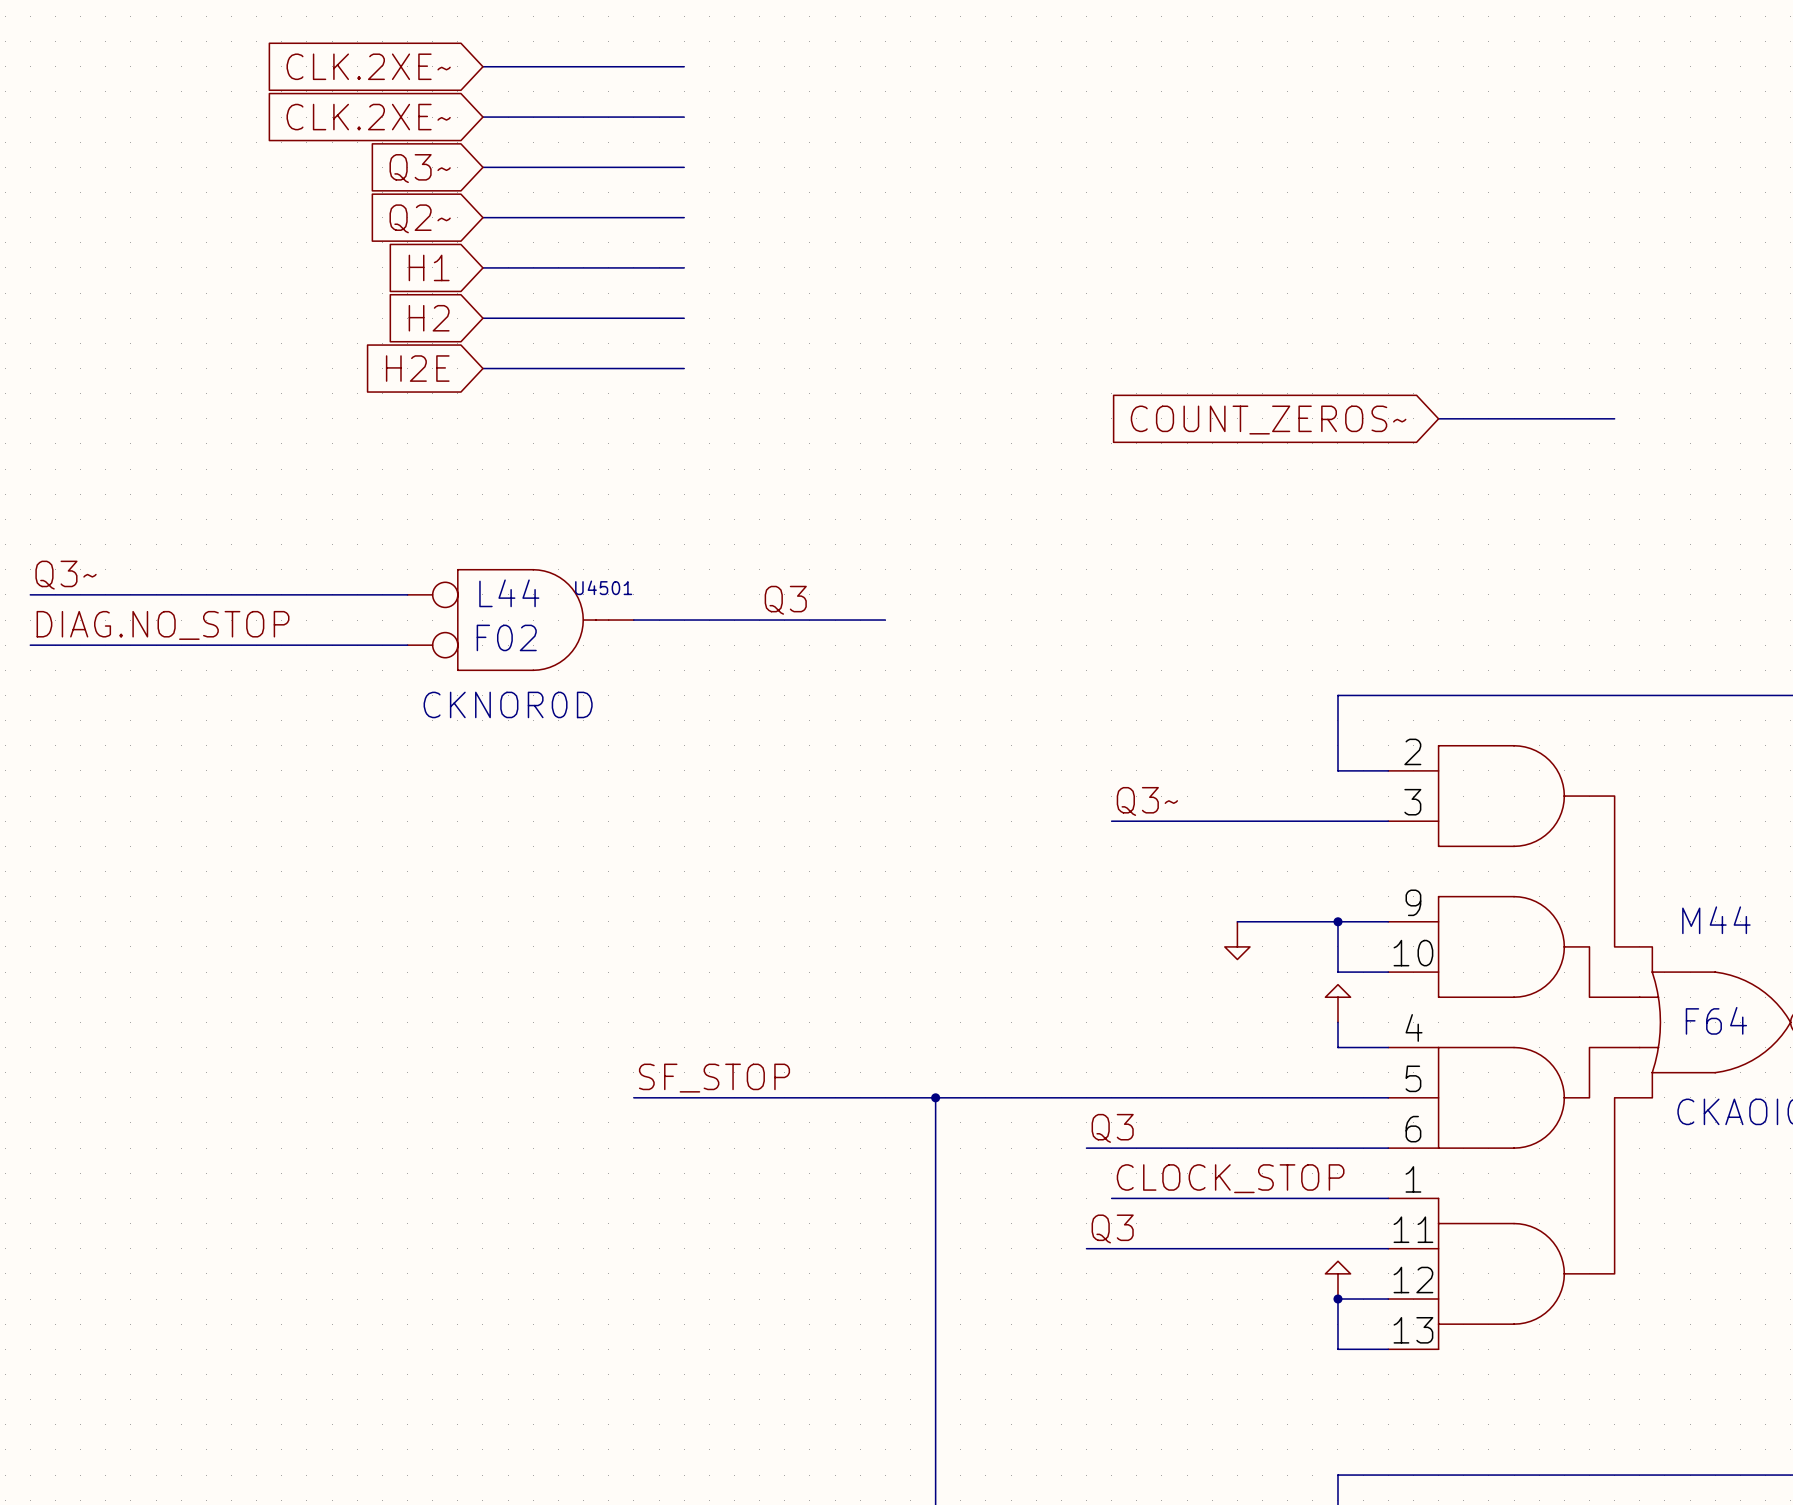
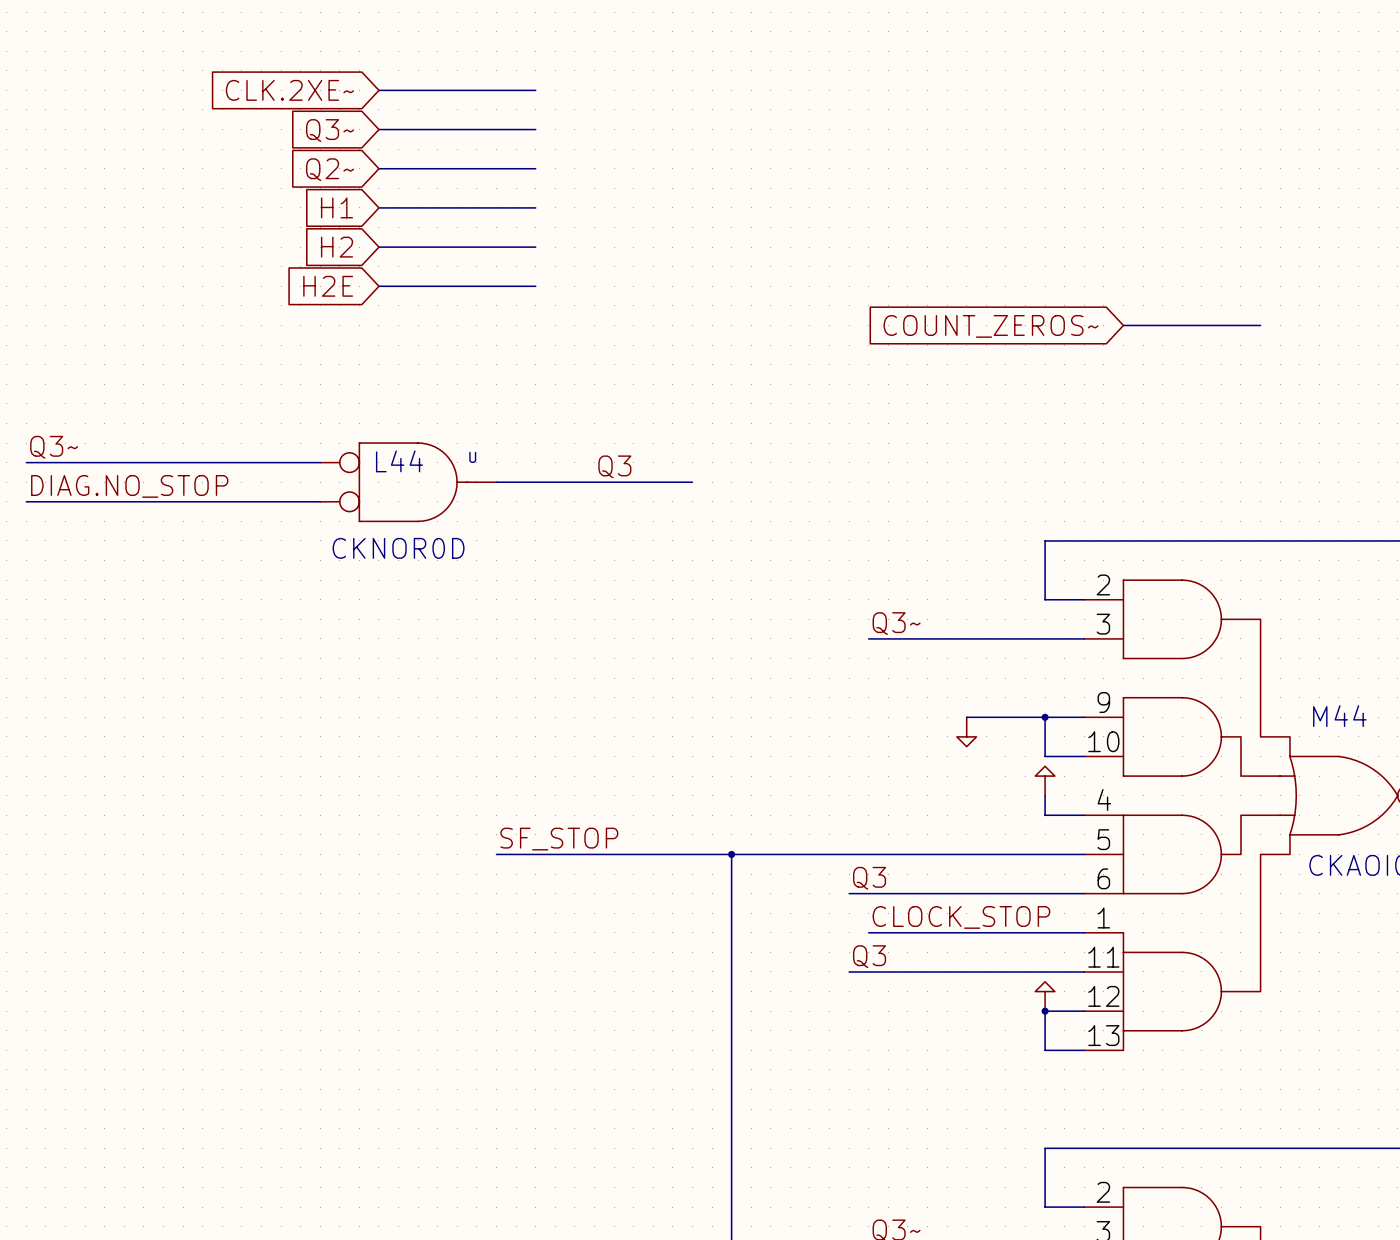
global label: CLK.2XE~ (368, 66) -> none
wire: (482, 66) (684, 66) -> none
U4501 name: U4501 (603, 587) -> U (472, 457)
U4501 value: F02 (506, 637) -> none
part value: F64 (1716, 1020) -> none

